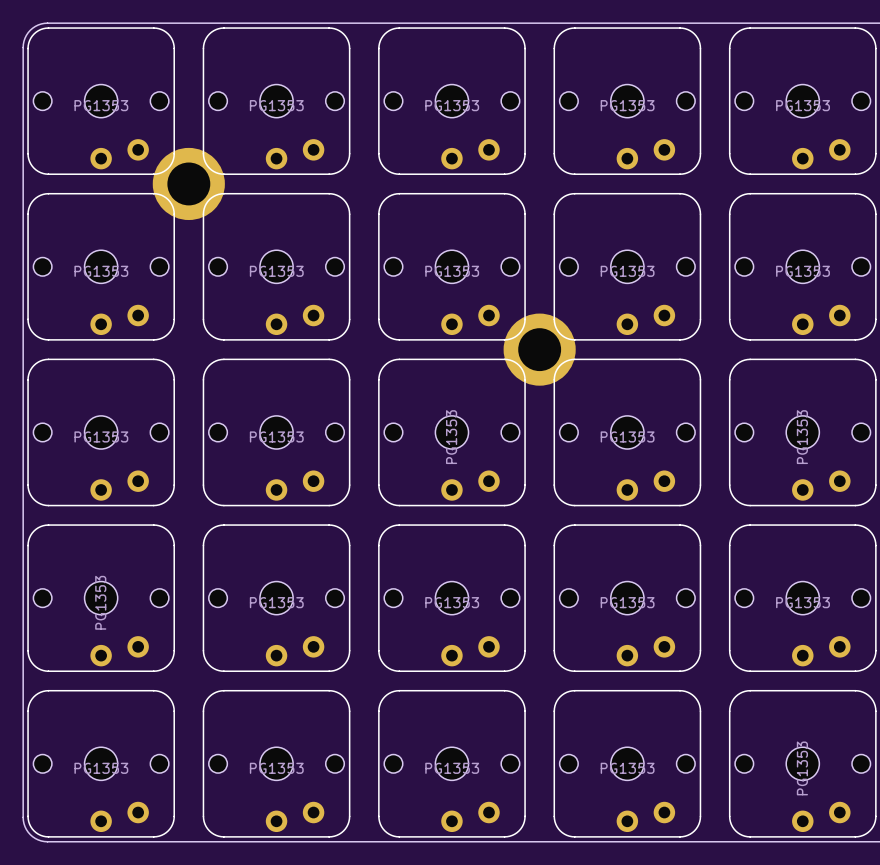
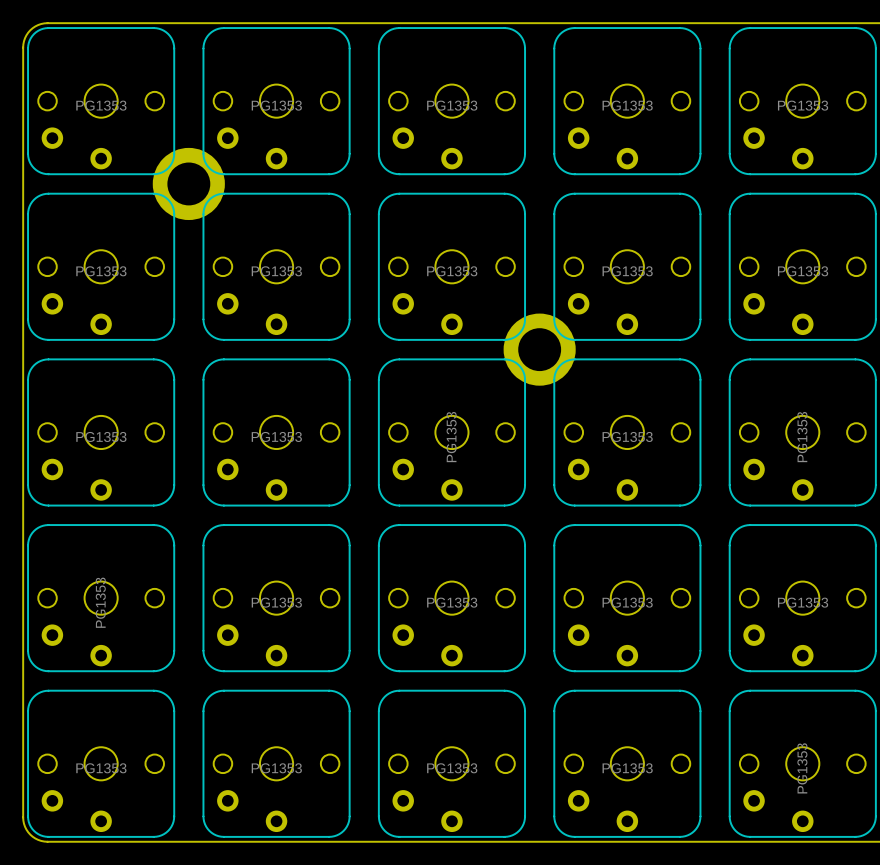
part footprint: [27, 27, 175, 175] -> [27, 27, 175, 175]
part footprint: [202, 27, 351, 175] -> [202, 27, 351, 175]
part footprint: [378, 27, 526, 175] -> [378, 27, 526, 175]
part footprint: [553, 27, 702, 175] -> [553, 27, 702, 175]
part footprint: [729, 27, 877, 175] -> [729, 27, 877, 175]
part footprint: [27, 193, 175, 341] -> [27, 193, 175, 341]
part footprint: [202, 193, 351, 341] -> [202, 193, 351, 341]
part footprint: [378, 193, 526, 341] -> [378, 193, 526, 341]
part footprint: [553, 193, 702, 341] -> [553, 193, 702, 341]
part footprint: [729, 193, 877, 341] -> [729, 193, 877, 341]
part footprint: [27, 358, 175, 507] -> [27, 358, 175, 507]
part footprint: [202, 358, 351, 507] -> [202, 358, 351, 507]
part footprint: [378, 358, 526, 507] -> [378, 358, 526, 507]
part footprint: [553, 358, 702, 507] -> [553, 358, 702, 507]
part footprint: [729, 358, 877, 507] -> [729, 358, 877, 507]
part footprint: [27, 524, 175, 672] -> [27, 524, 175, 672]
part footprint: [202, 524, 351, 672] -> [202, 524, 351, 672]
part footprint: [378, 524, 526, 672] -> [378, 524, 526, 672]
part footprint: [553, 524, 702, 672] -> [553, 524, 702, 672]
part footprint: [729, 524, 877, 672] -> [729, 524, 877, 672]
part footprint: [27, 690, 175, 838] -> [27, 690, 175, 838]
part footprint: [202, 690, 351, 838] -> [202, 690, 351, 838]
part footprint: [378, 690, 526, 838] -> [378, 690, 526, 838]
part footprint: [553, 690, 702, 838] -> [553, 690, 702, 838]
part footprint: [729, 690, 877, 838] -> [729, 690, 877, 838]

